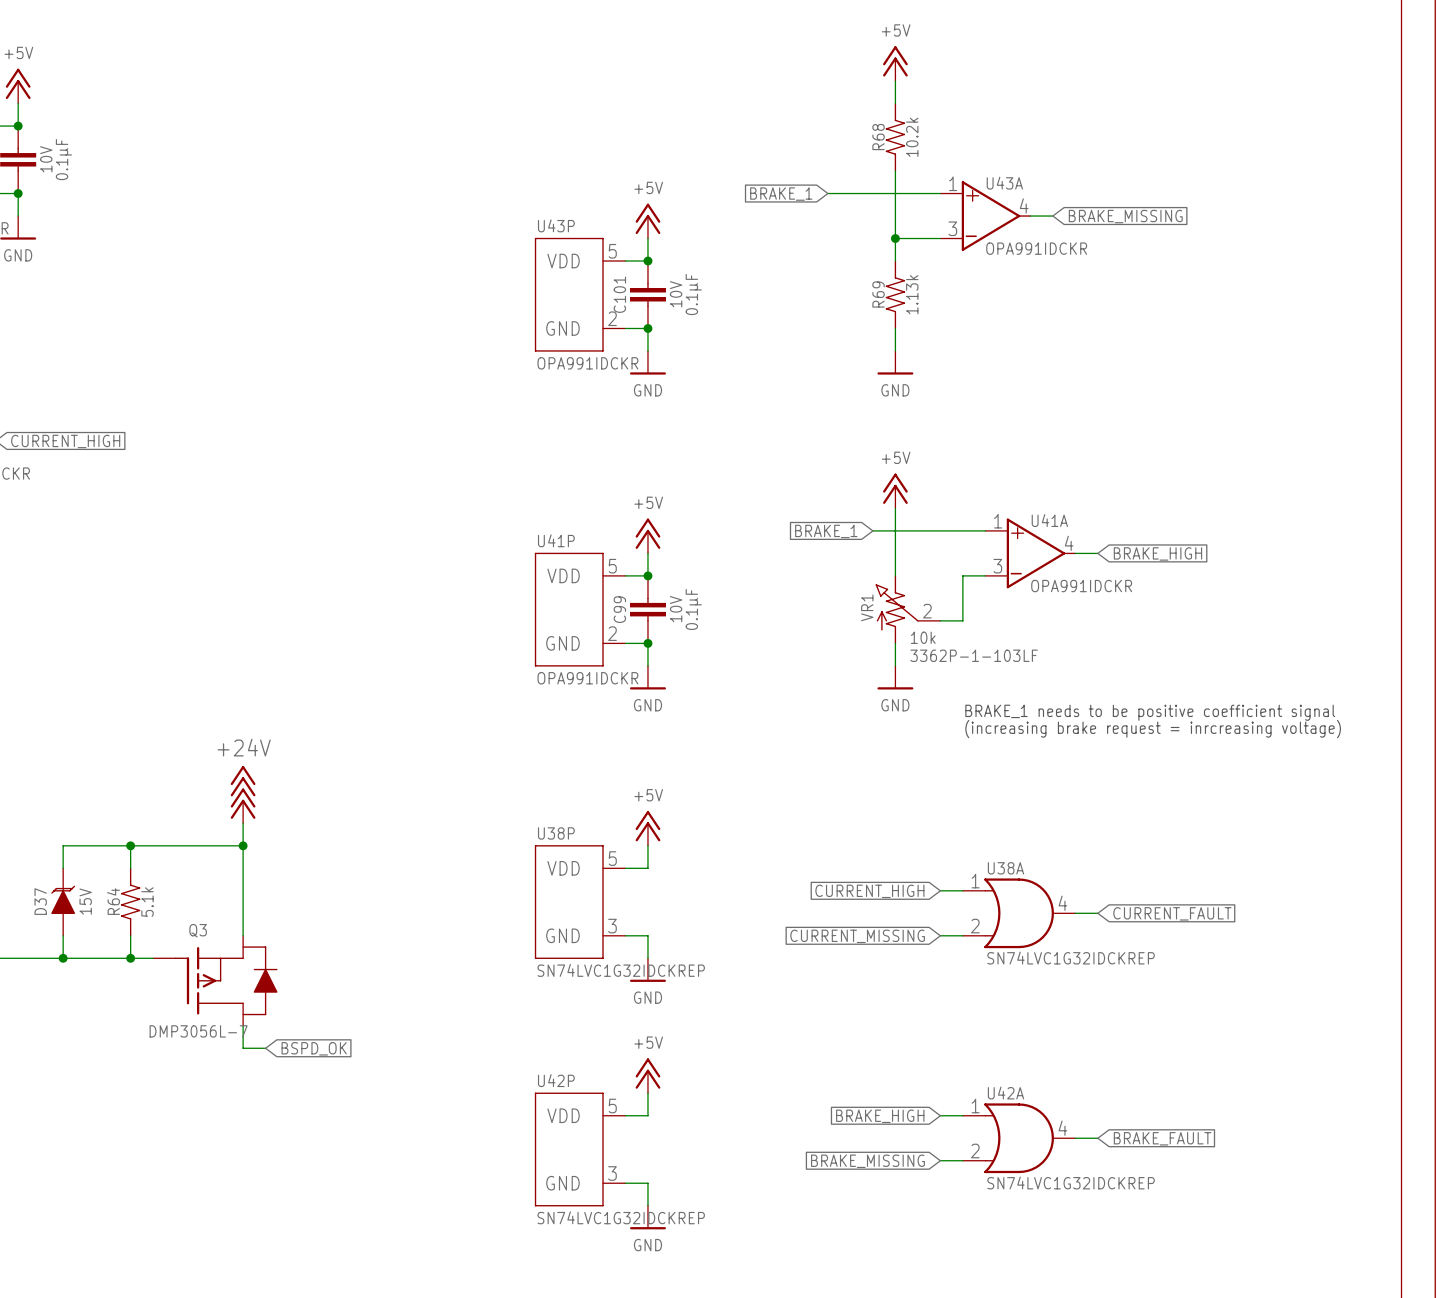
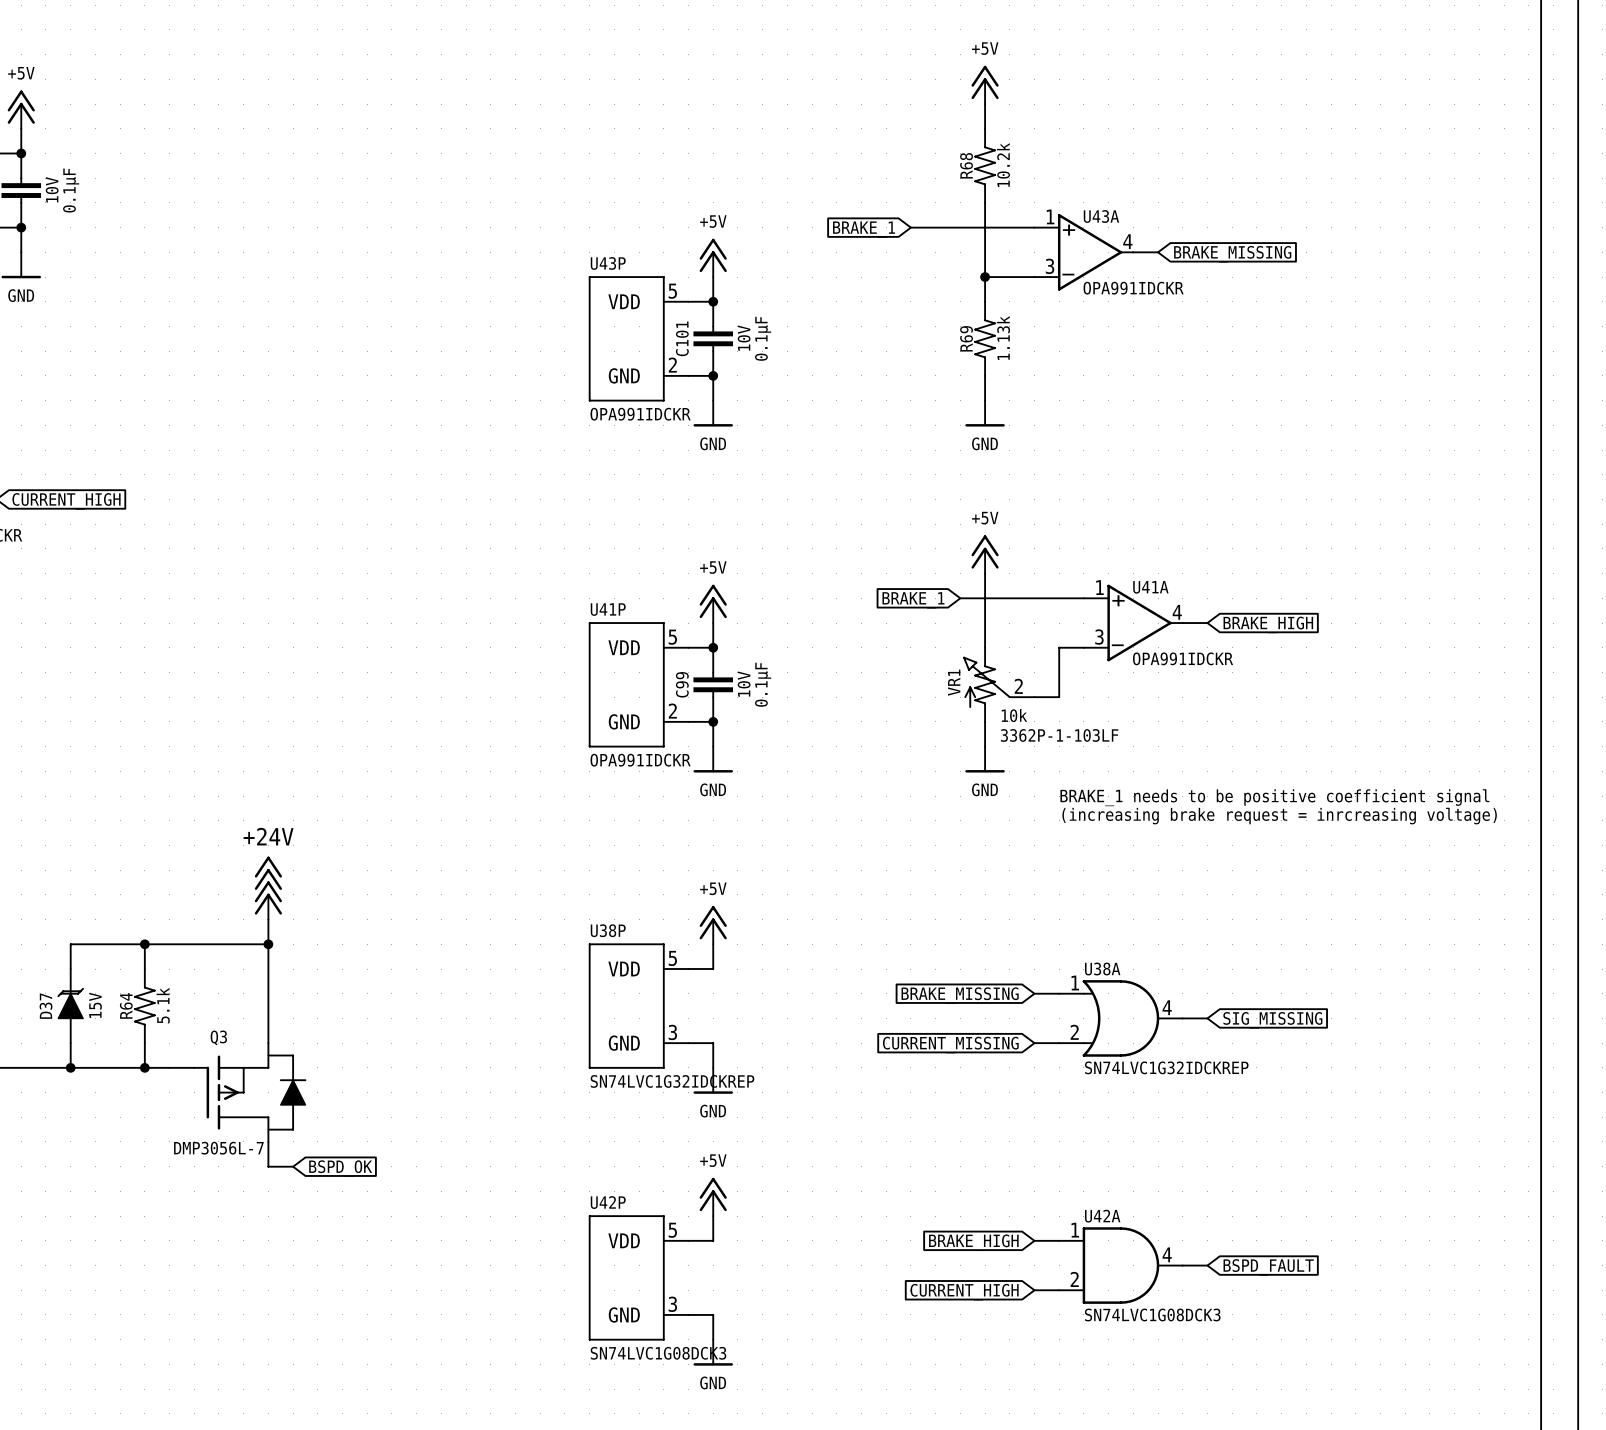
global label: CURRENT_HIGH (869, 891) -> BRAKE_MISSING (960, 995)
global label: CURRENT_FAULT (1172, 913) -> SIG_MISSING (1272, 1020)
U42A symbol: [962, 1103, 1076, 1174] -> [1059, 1227, 1183, 1304]
global label: BRAKE_FAULT (1162, 1138) -> BSPD_FAULT (1268, 1267)
global label: BRAKE_MISSING (867, 1161) -> CURRENT_HIGH (964, 1292)
U42A text: SN74LVC1G32IDCKREP (1071, 1182) -> SN74LVC1G08DCK3 (1152, 1314)
U42P text: SN74LVC1G32IDCKREP (621, 1217) -> SN74LVC1G08DCK3 (658, 1353)

